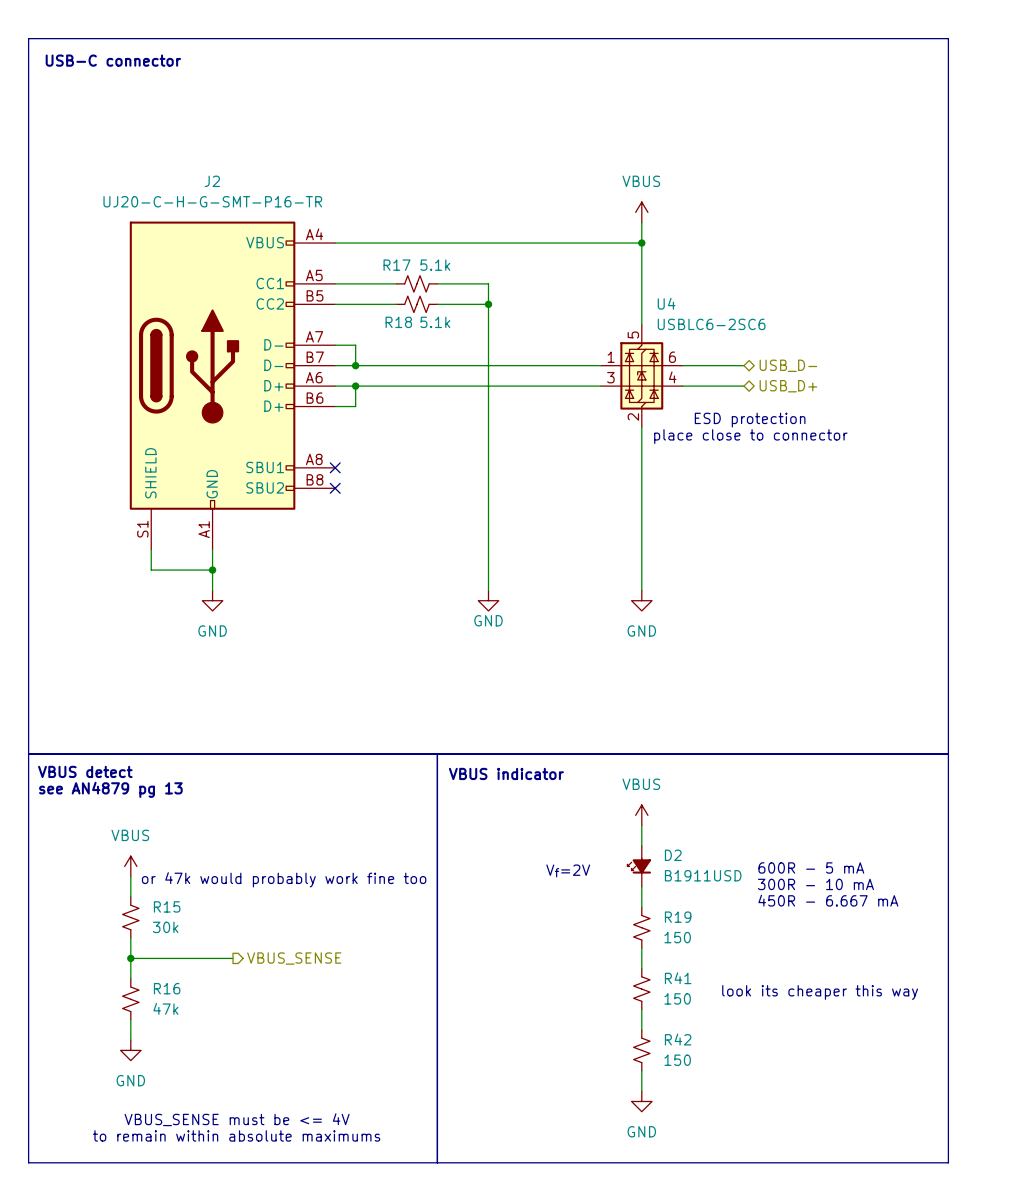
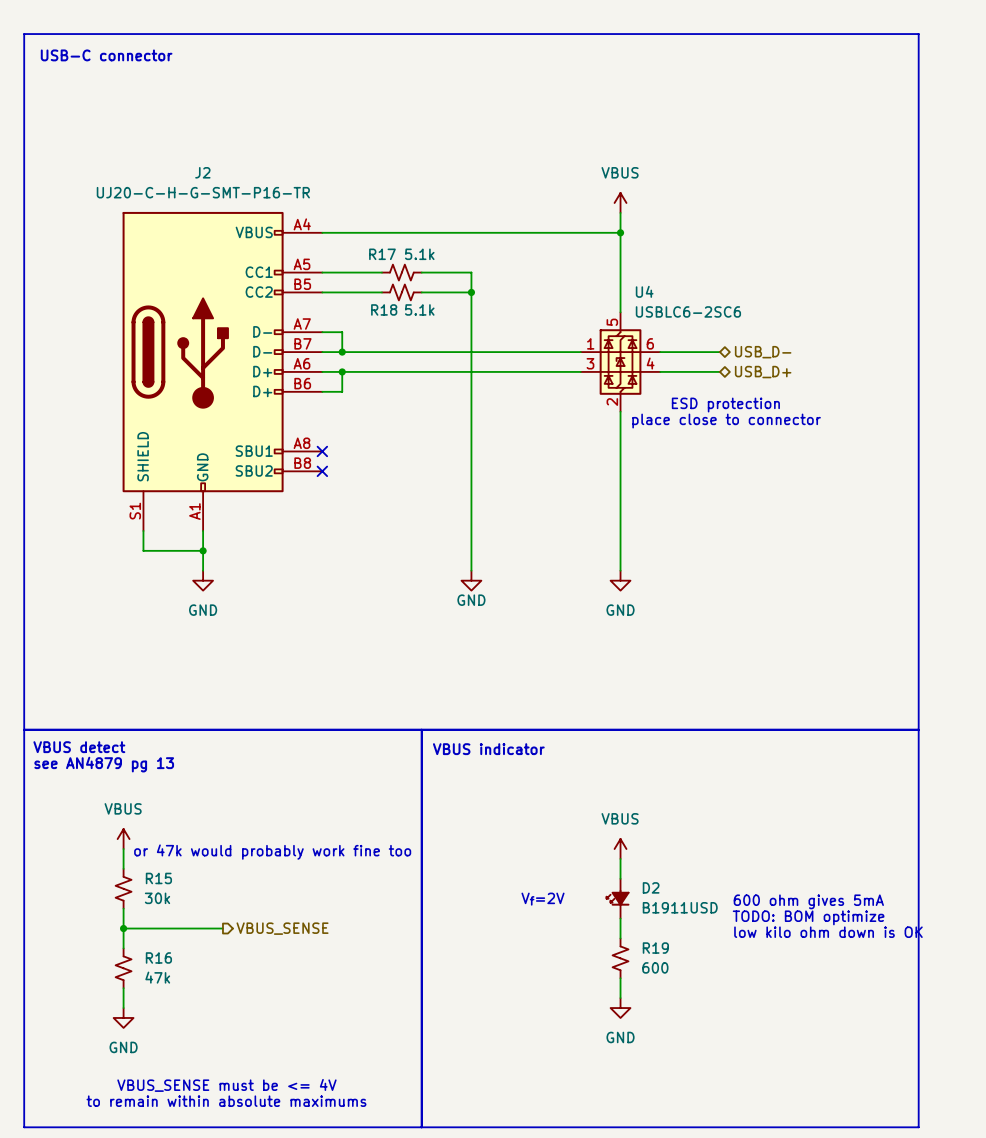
power symbol position: VBUS (641, 815) -> VBUS (620, 849)
wire: (641, 825) (641, 845) -> none
D2 position: (639, 866) -> (618, 898)
text: 600R - 5 mA (811, 867) -> none
text position: Vf=2V (568, 870) -> Vf=2V (543, 899)
text: 300R - 10 mA (815, 884) -> none
text: 450R - 6.667 mA (828, 900) -> none
R19: 150 (641, 927) -> none
text: none -> 600 ohm gives 5mA (808, 901)
text: none -> TODO: BOM optimize (808, 917)
text: none -> low kilo ohm down is OK (828, 932)
R41 name: R41 (678, 978) -> R19 (655, 948)
text: look its cheaper this way (820, 992) -> none
R41 value: 150 (677, 998) -> 600 (655, 967)
R42: 150 (641, 1050) -> none
wire: (641, 1070) (641, 1091) -> none
power symbol position: GND (641, 1101) -> GND (620, 1008)

